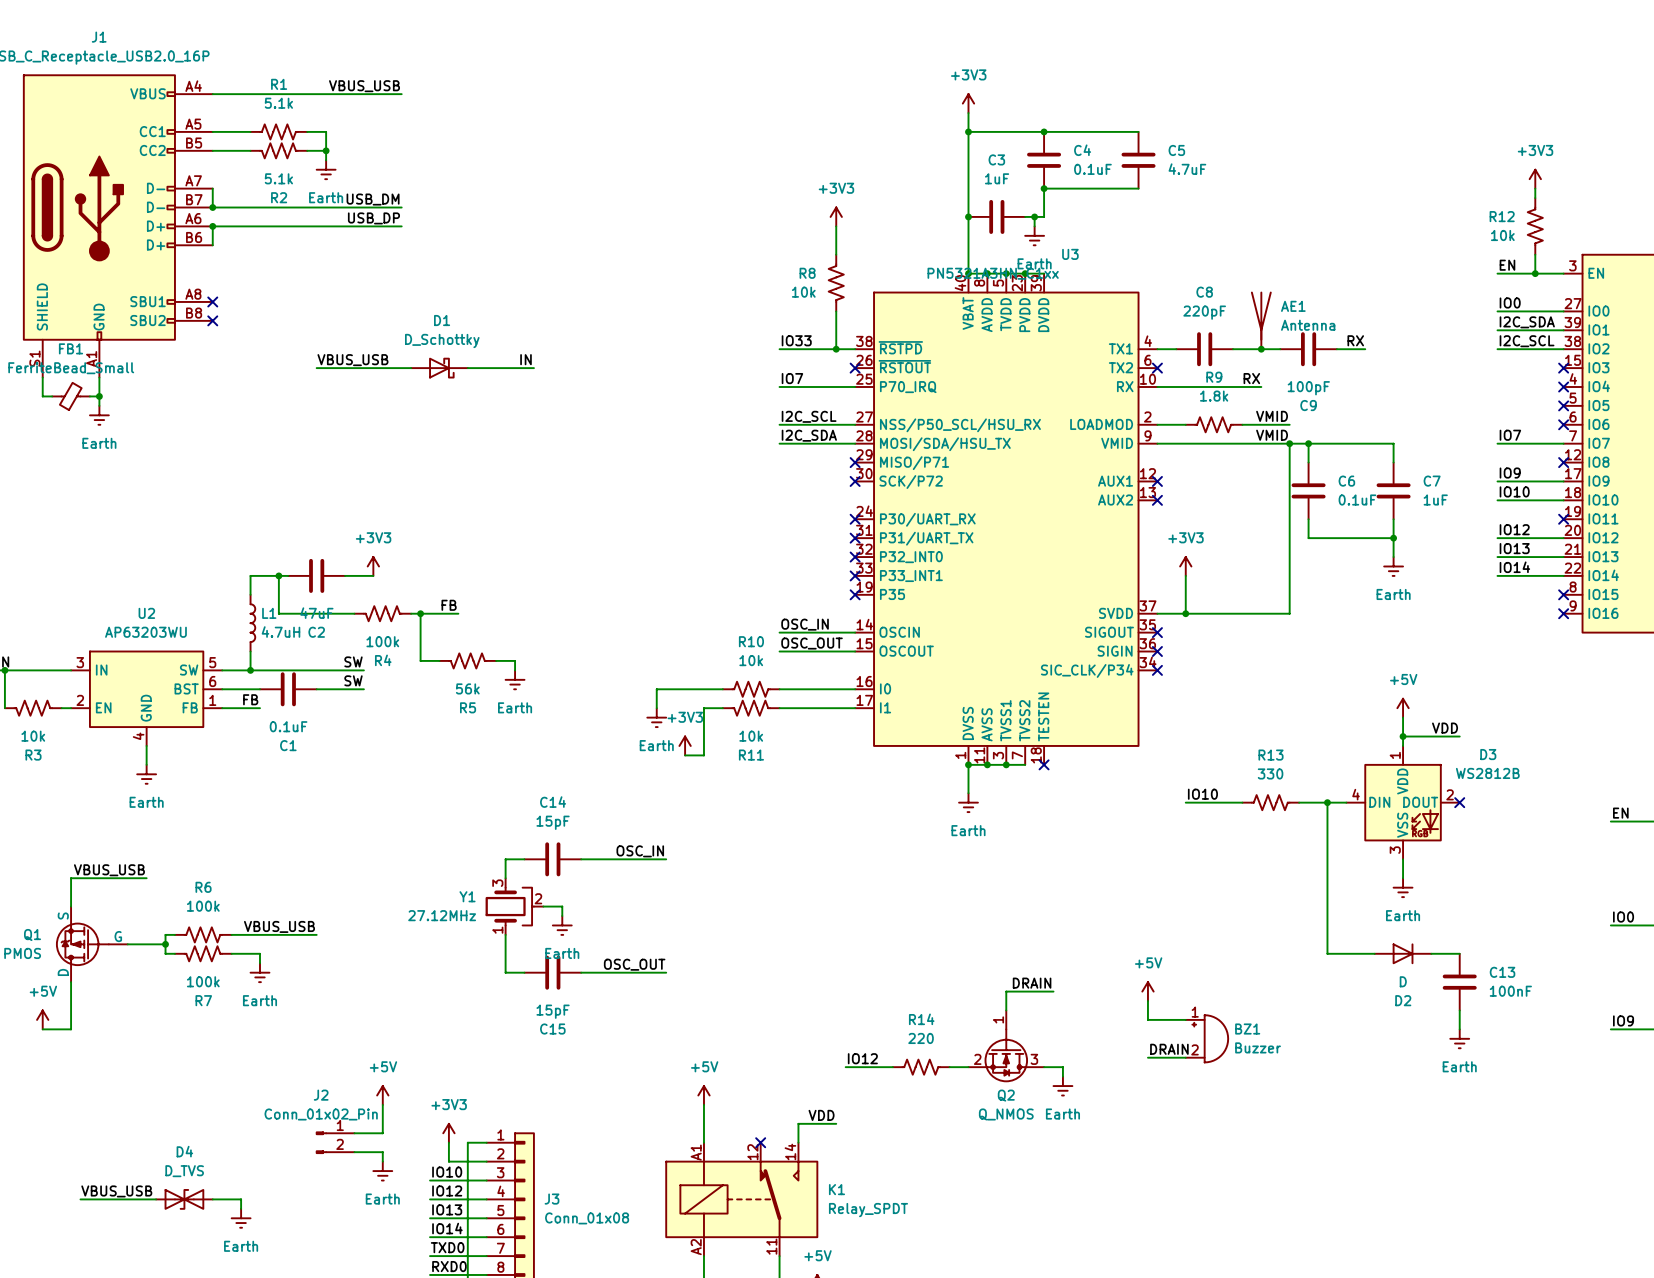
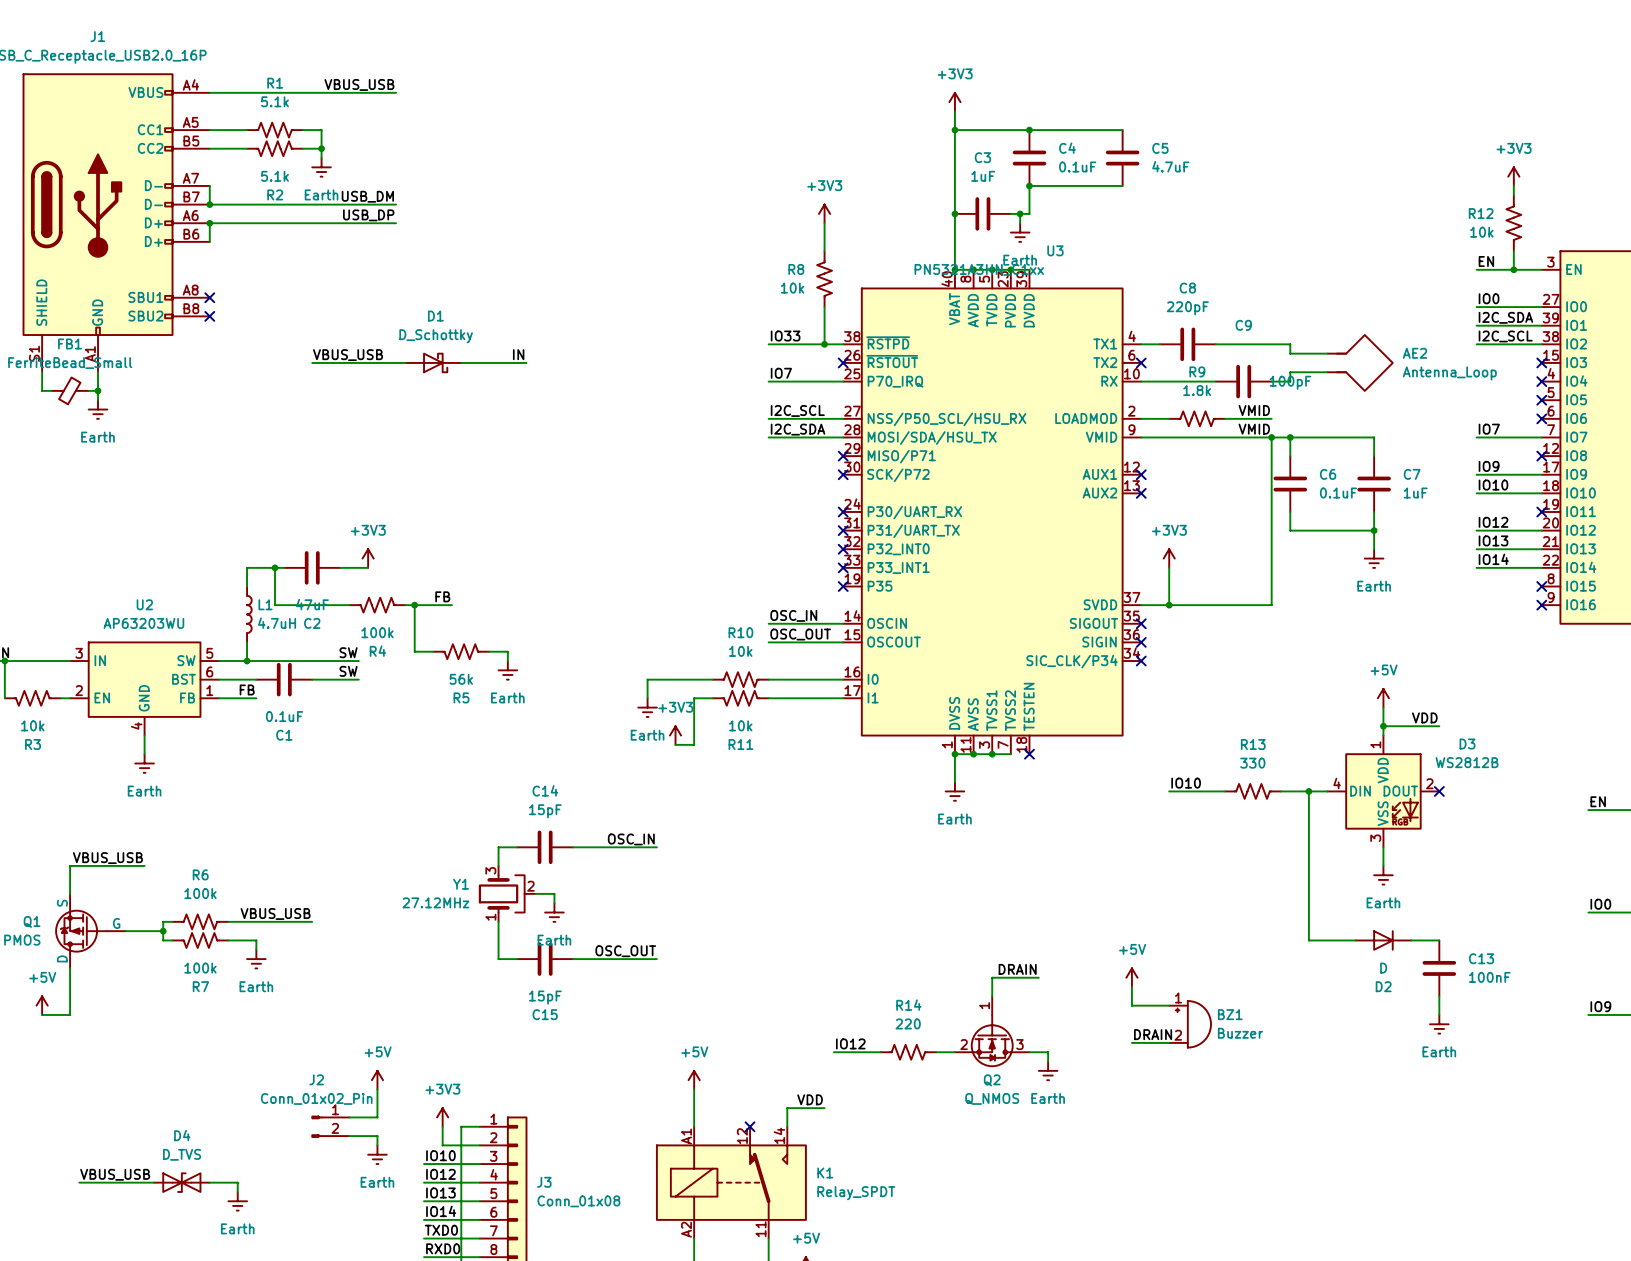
AE1: Antenna (1261, 320) -> none
label: RX (1355, 340) -> none
junction: (1261, 349) -> none
wire: none -> (1262, 344) (1290, 344) (1290, 353) (1327, 353)
C9 position: (1308, 349) -> (1243, 381)
wire: (1336, 349) (1365, 349) -> none
AE2: none -> Antenna_Loop (1360, 362)
wire: none -> (1327, 372) (1290, 372) (1290, 381) (1271, 381)
label: RX (1251, 378) -> none
C9 name position: C9 (1308, 405) -> C9 (1243, 325)

